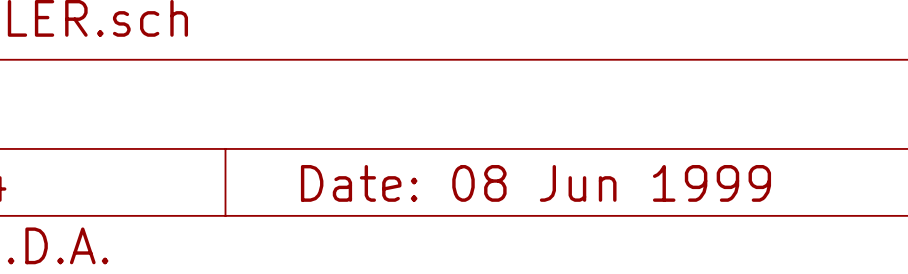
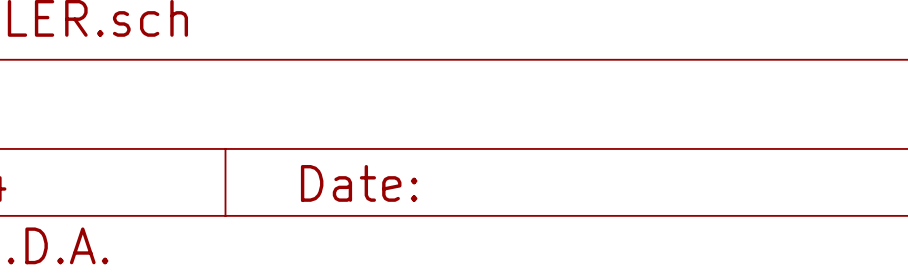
title block: Date: 08 Jun 1999 (535, 183) -> Date: (359, 183)

